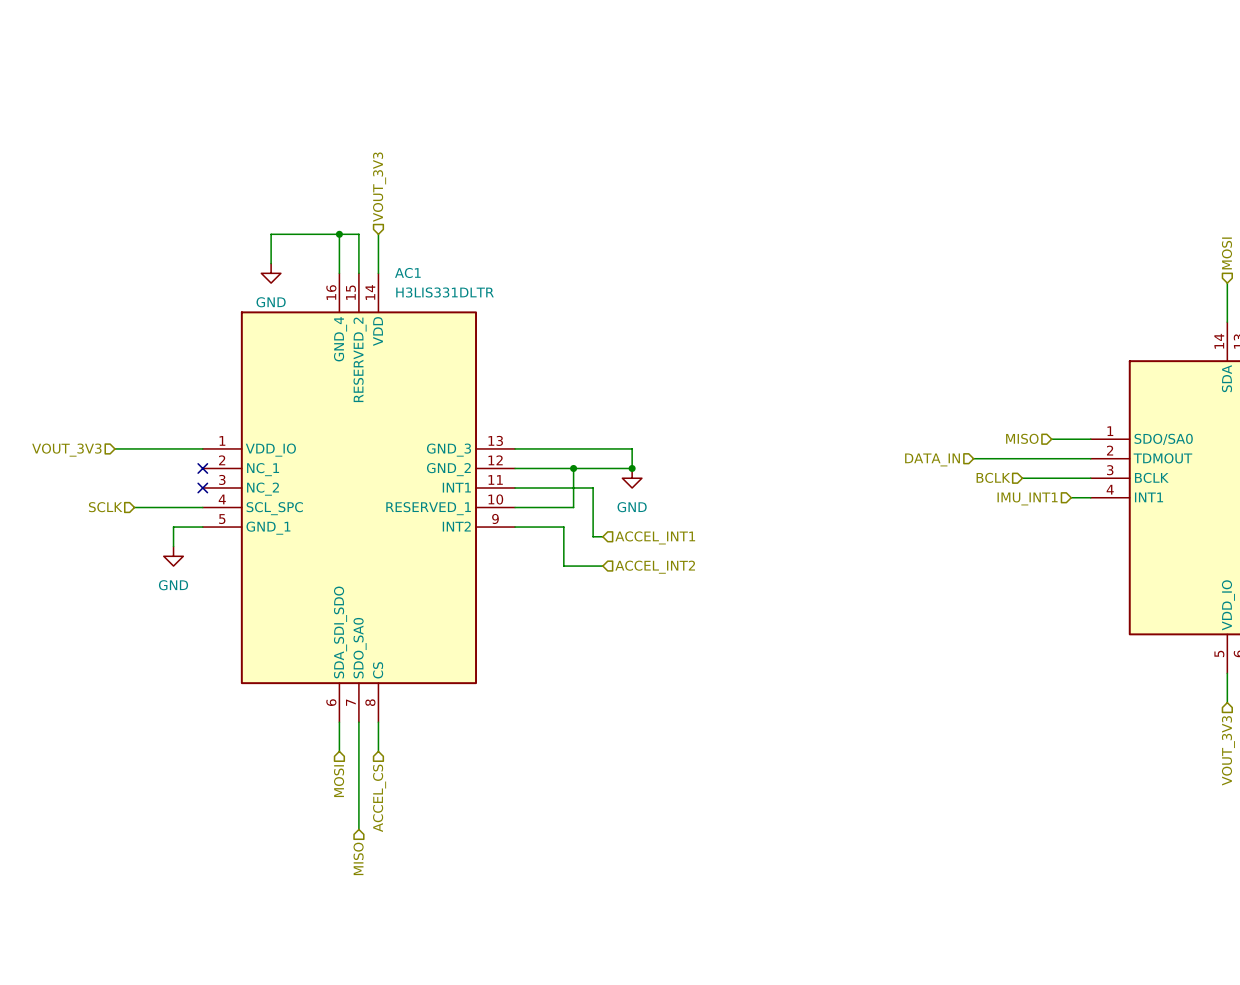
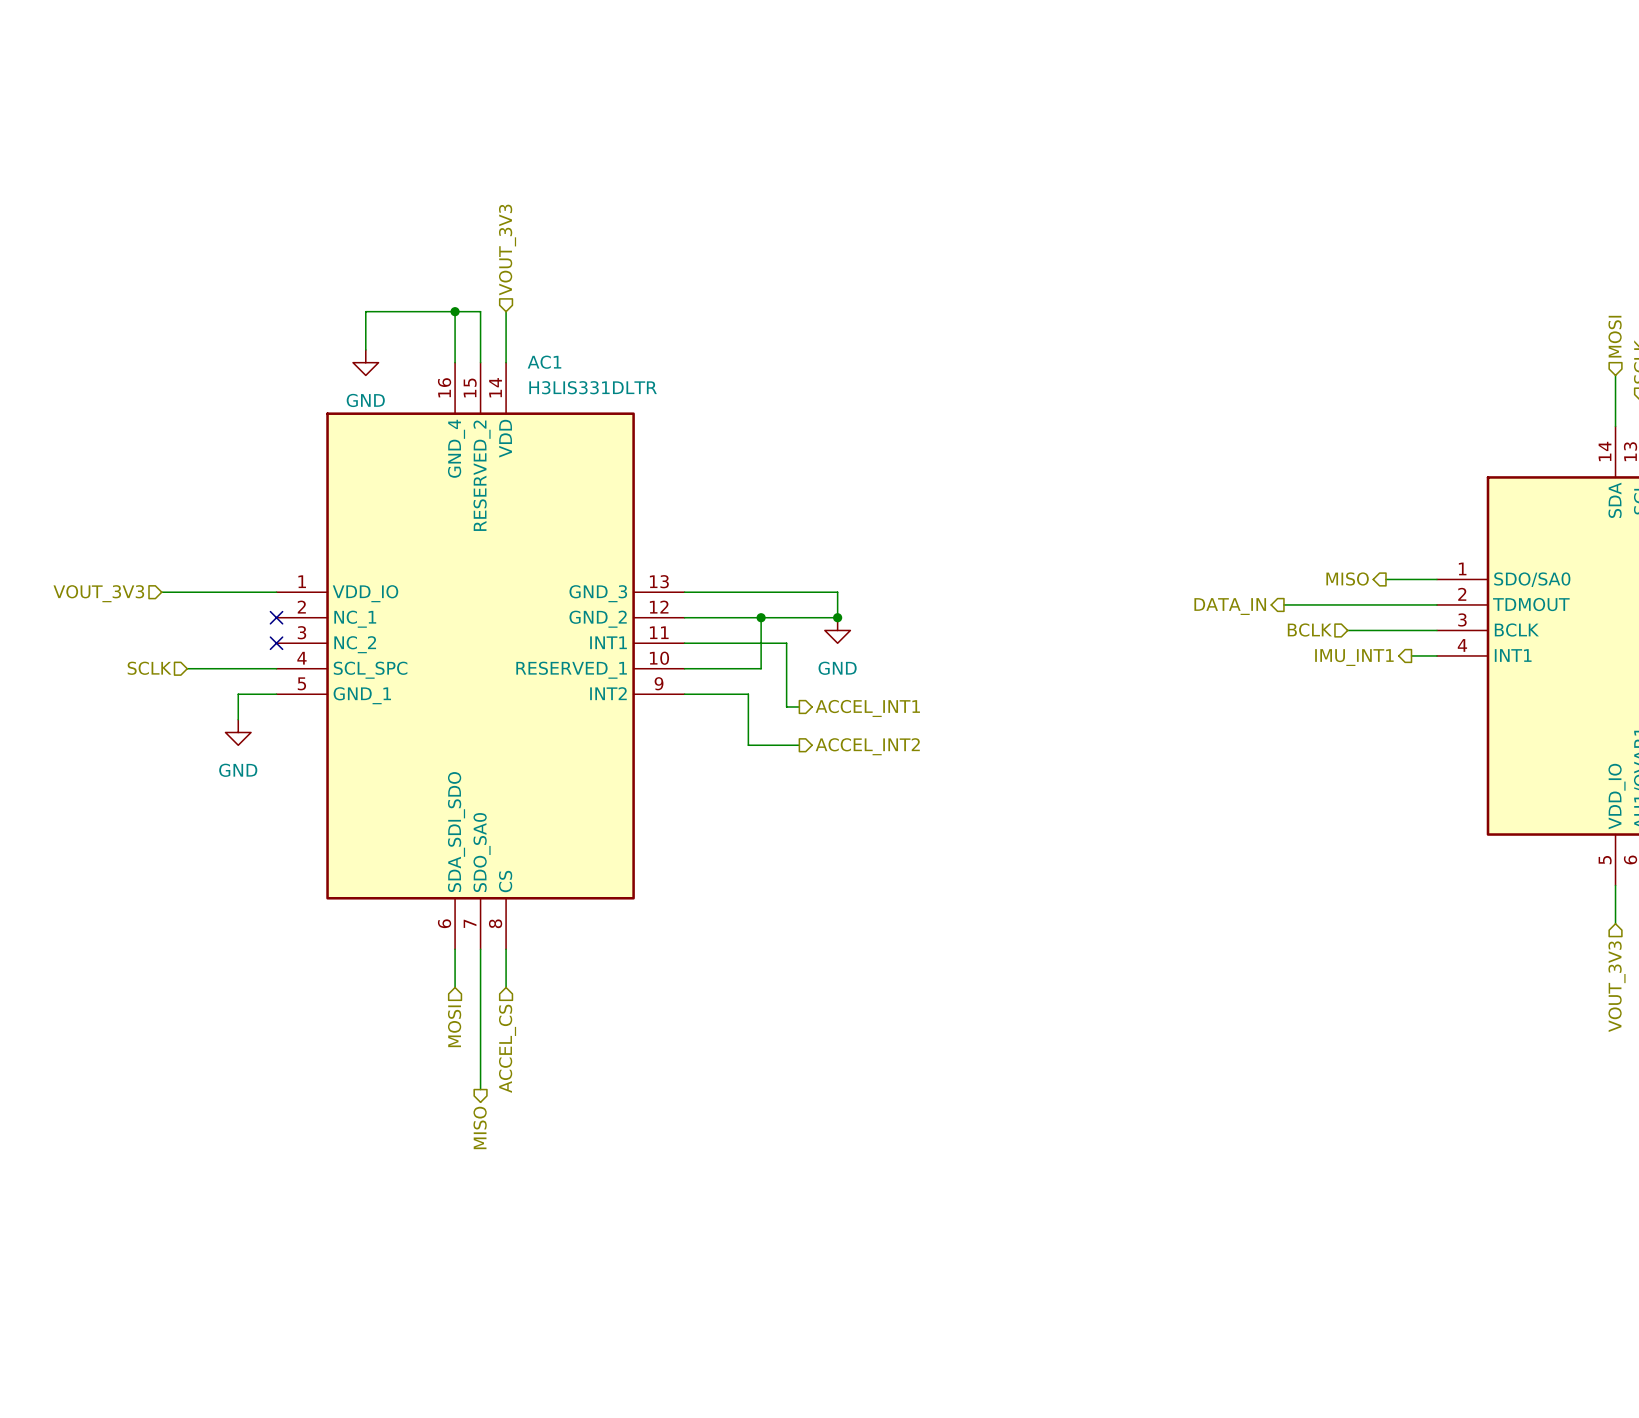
hierarchical label shape: input (1022, 438) -> output (1347, 579)
hierarchical label shape: input (932, 459) -> output (1230, 606)
hierarchical label shape: input (1027, 498) -> output (1354, 657)
hierarchical label shape: input (655, 537) -> output (867, 708)
hierarchical label shape: input (655, 567) -> output (867, 746)
hierarchical label shape: input (358, 858) -> output (480, 1127)

